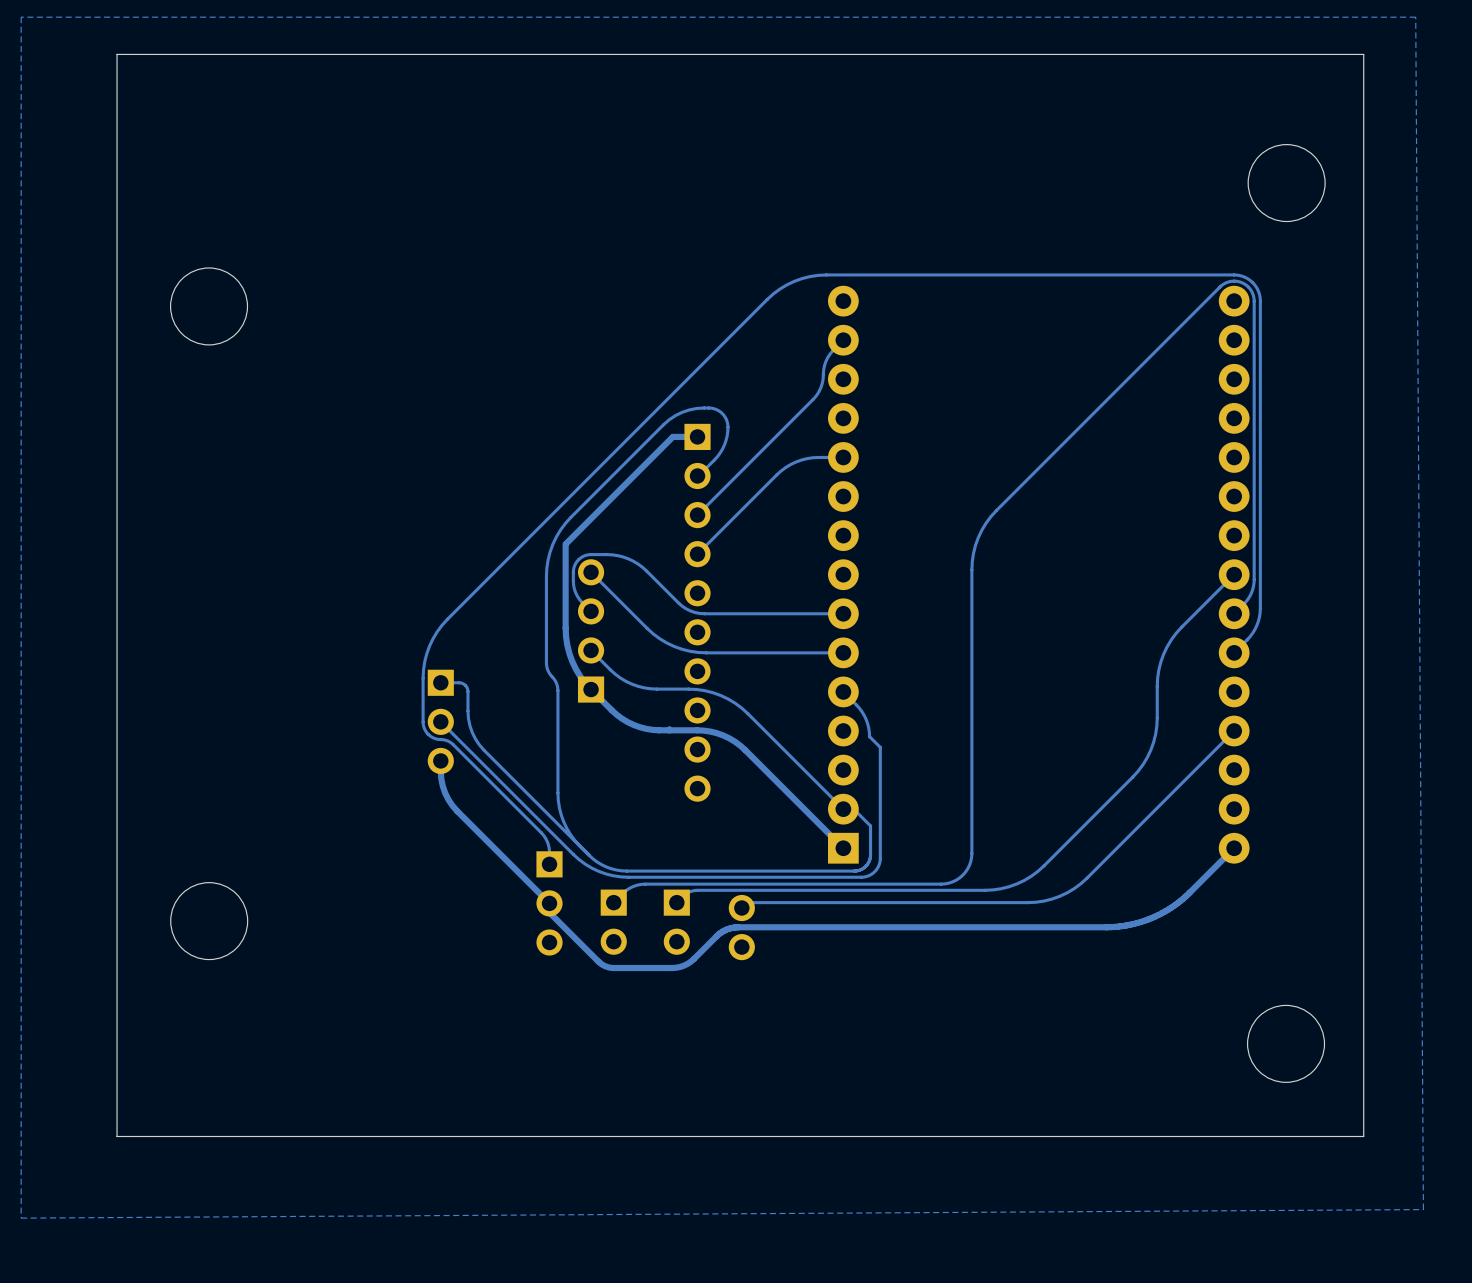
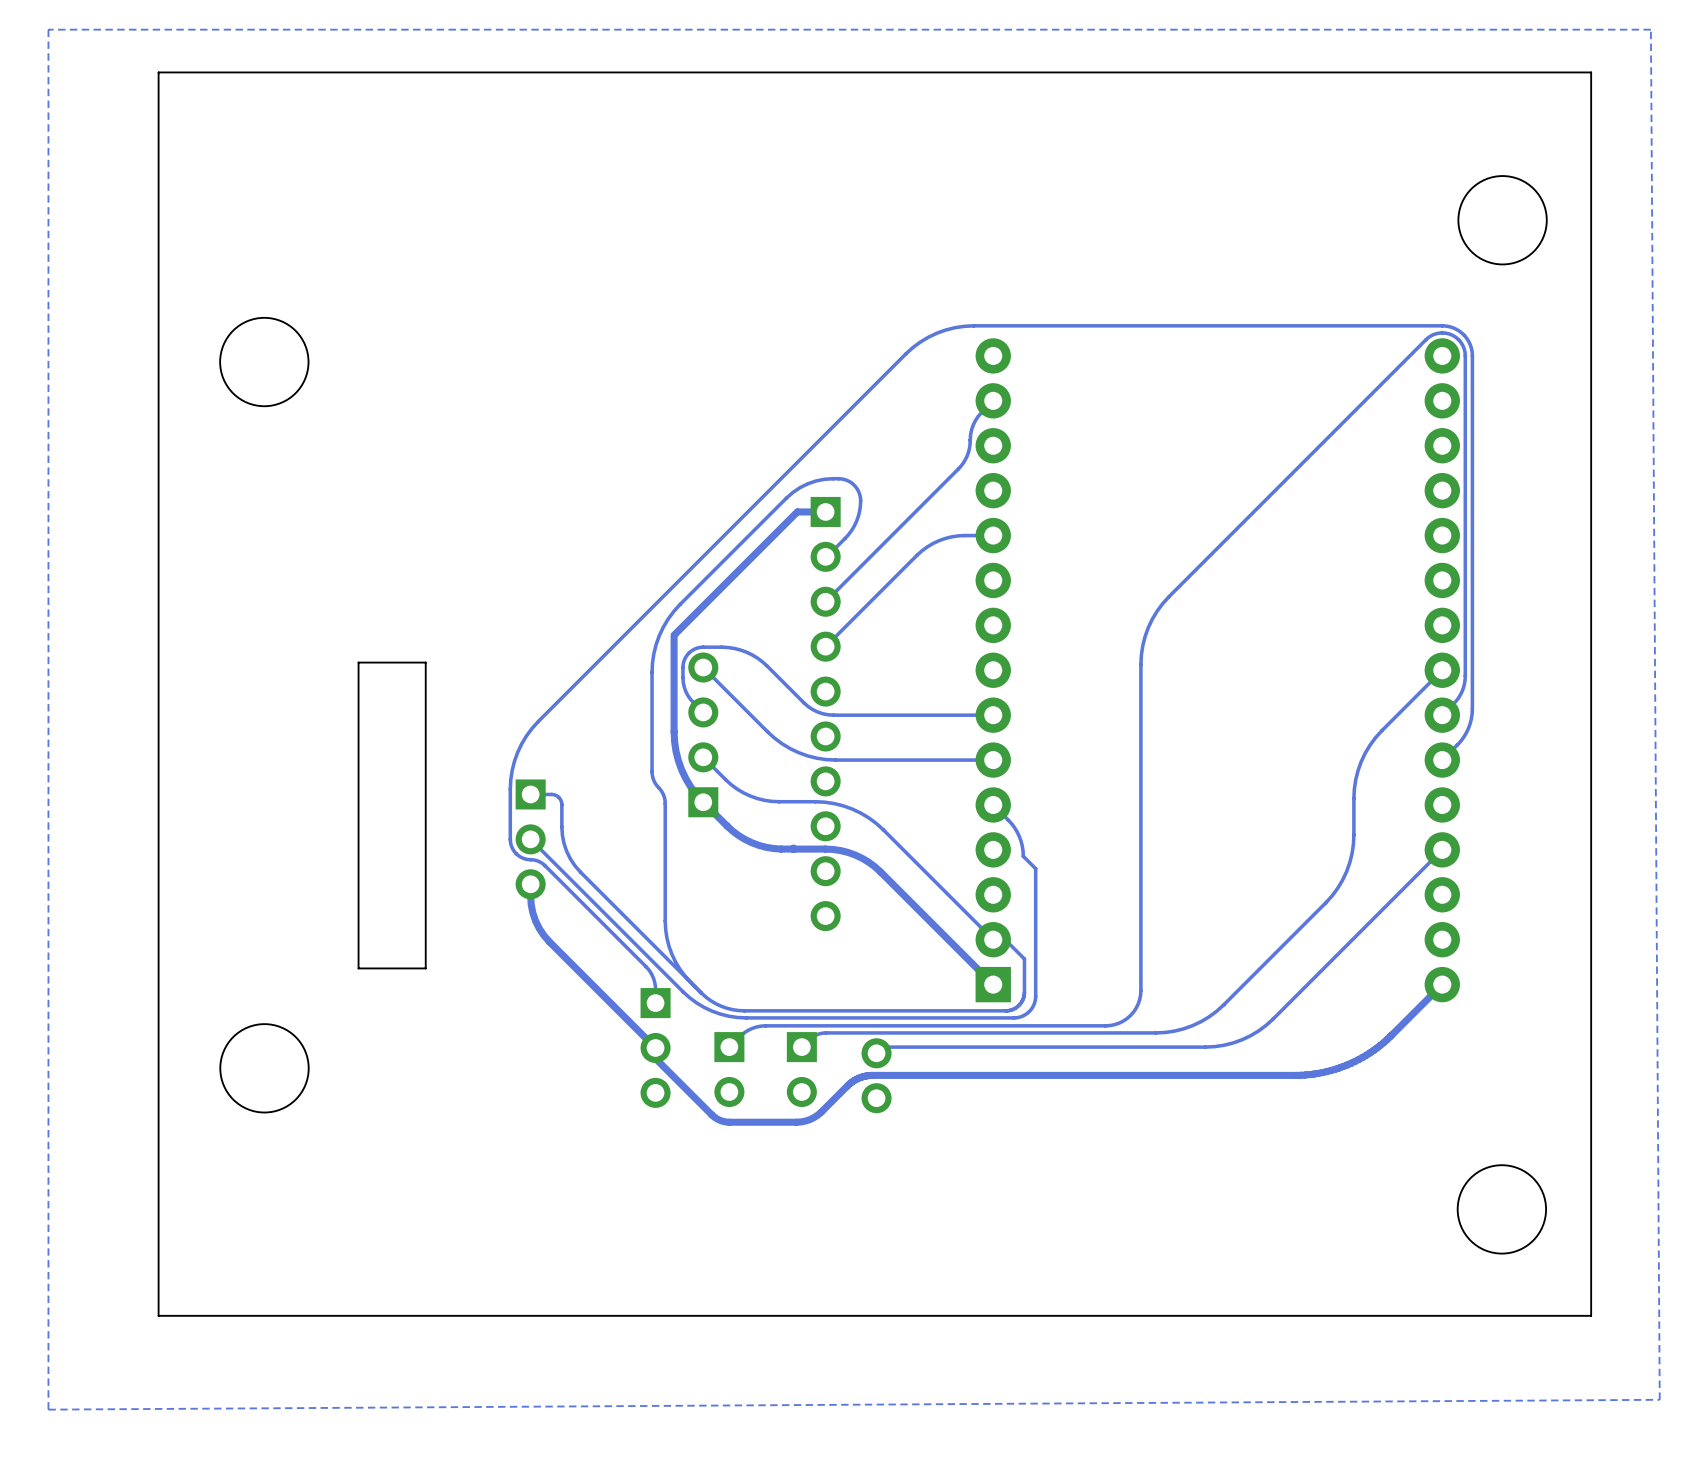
board edge: none -> (425, 662) (358, 662) (358, 968) (425, 968) (425, 662)

